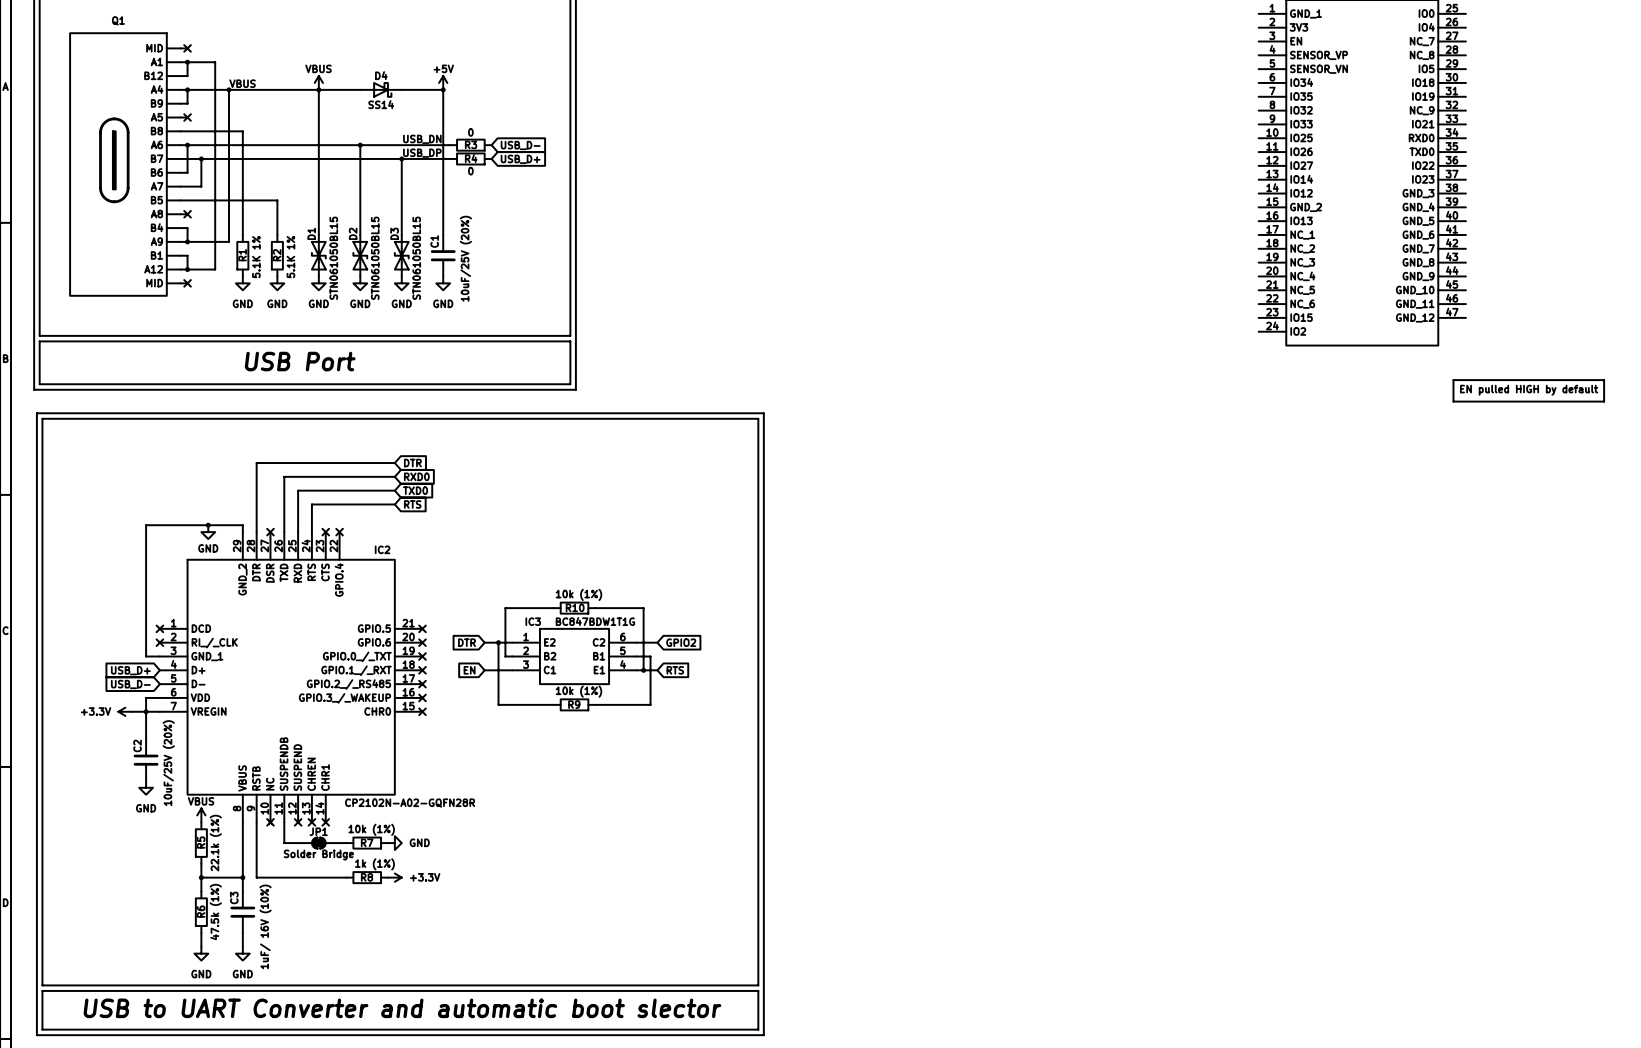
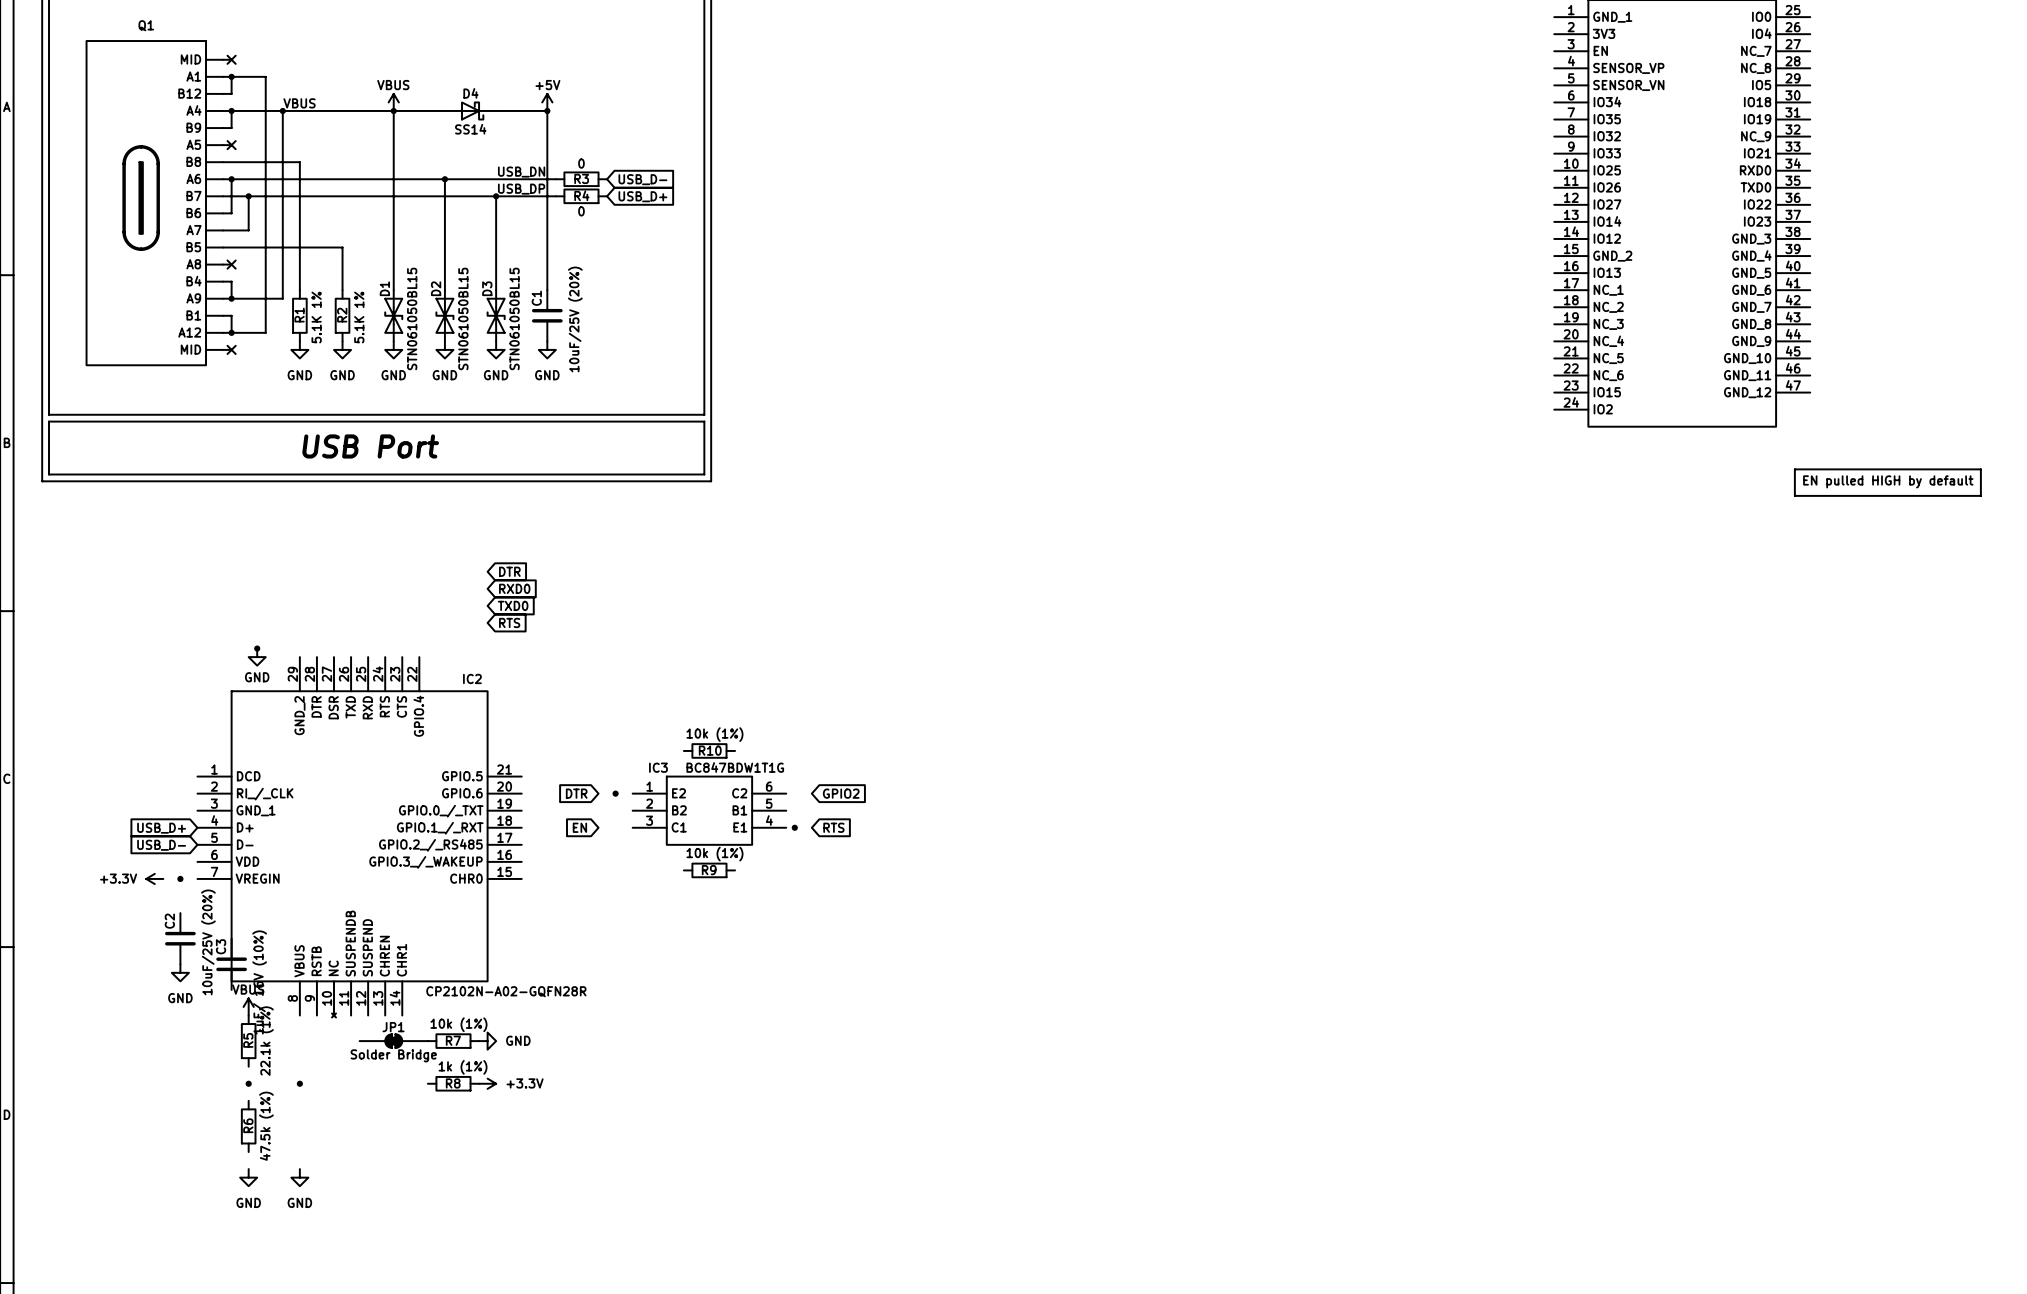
line: (36, 413) (763, 413) (763, 1035) (36, 1035) (36, 413) -> none
line: (42, 418) (758, 418) (758, 985) (42, 985) (42, 418) -> none
wire: (394, 463) (256, 463) (256, 532) -> none
wire: (394, 476) (284, 476) (284, 532) -> none
wire: (394, 490) (298, 490) (298, 532) -> none
wire: (394, 504) (311, 504) (311, 532) -> none
wire: (242, 532) (242, 525) (146, 525) (146, 656) (159, 656) -> none
no-connect mark: (270, 532) -> none
no-connect mark: (325, 532) -> none
no-connect mark: (339, 532) -> none
wire: (553, 608) (505, 608) (505, 656) (512, 656) -> none
wire: (595, 608) (643, 608) (643, 670) -> none
no-connect mark: (159, 628) -> none
no-connect mark: (422, 628) -> none
no-connect mark: (159, 642) -> none
no-connect mark: (422, 642) -> none
wire: (484, 642) (512, 642) -> none
wire: (498, 642) (498, 704) (553, 704) -> none
wire: (636, 642) (657, 642) -> none
no-connect mark: (422, 656) -> none
wire: (636, 656) (650, 656) (650, 704) (595, 704) -> none
no-connect mark: (422, 670) -> none
wire: (484, 670) (512, 670) -> none
wire: (636, 670) (657, 670) -> none
no-connect mark: (422, 684) -> none
wire: (159, 697) (146, 697) (146, 739) -> none
no-connect mark: (422, 697) -> none
wire: (132, 711) (159, 711) -> none
no-connect mark: (422, 711) -> none
wire: (242, 822) (242, 891) -> none
wire: (256, 822) (256, 877) (346, 877) -> none
no-connect mark: (270, 822) -> none
wire: (284, 822) (284, 843) (291, 843) -> none
no-connect mark: (298, 822) -> none
no-connect mark: (311, 822) -> none
no-connect mark: (325, 822) -> none
wire: (201, 863) (201, 891) -> none
wire: (201, 877) (242, 877) -> none
C3 position: (242, 912) -> (231, 964)
wire: (201, 932) (201, 946) -> none
wire: (242, 932) (242, 946) -> none
line: (42, 990) (42, 1029) (758, 1029) (758, 990) (42, 990) -> none
text: USB to UART Converter and automatic boot slector (402, 1008) -> none

